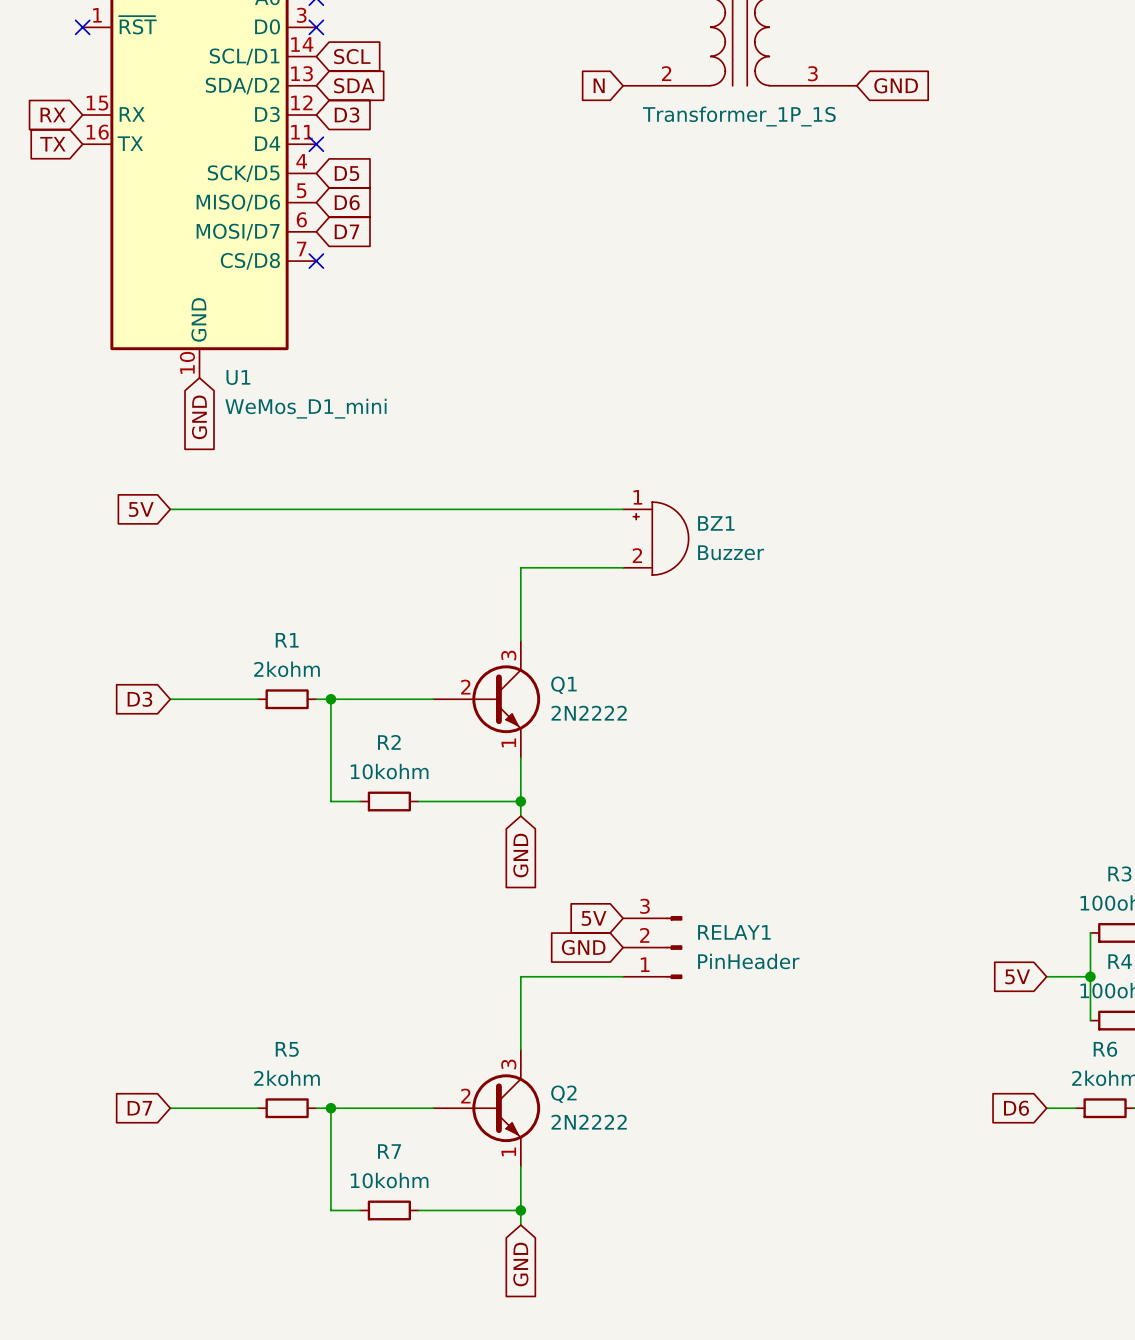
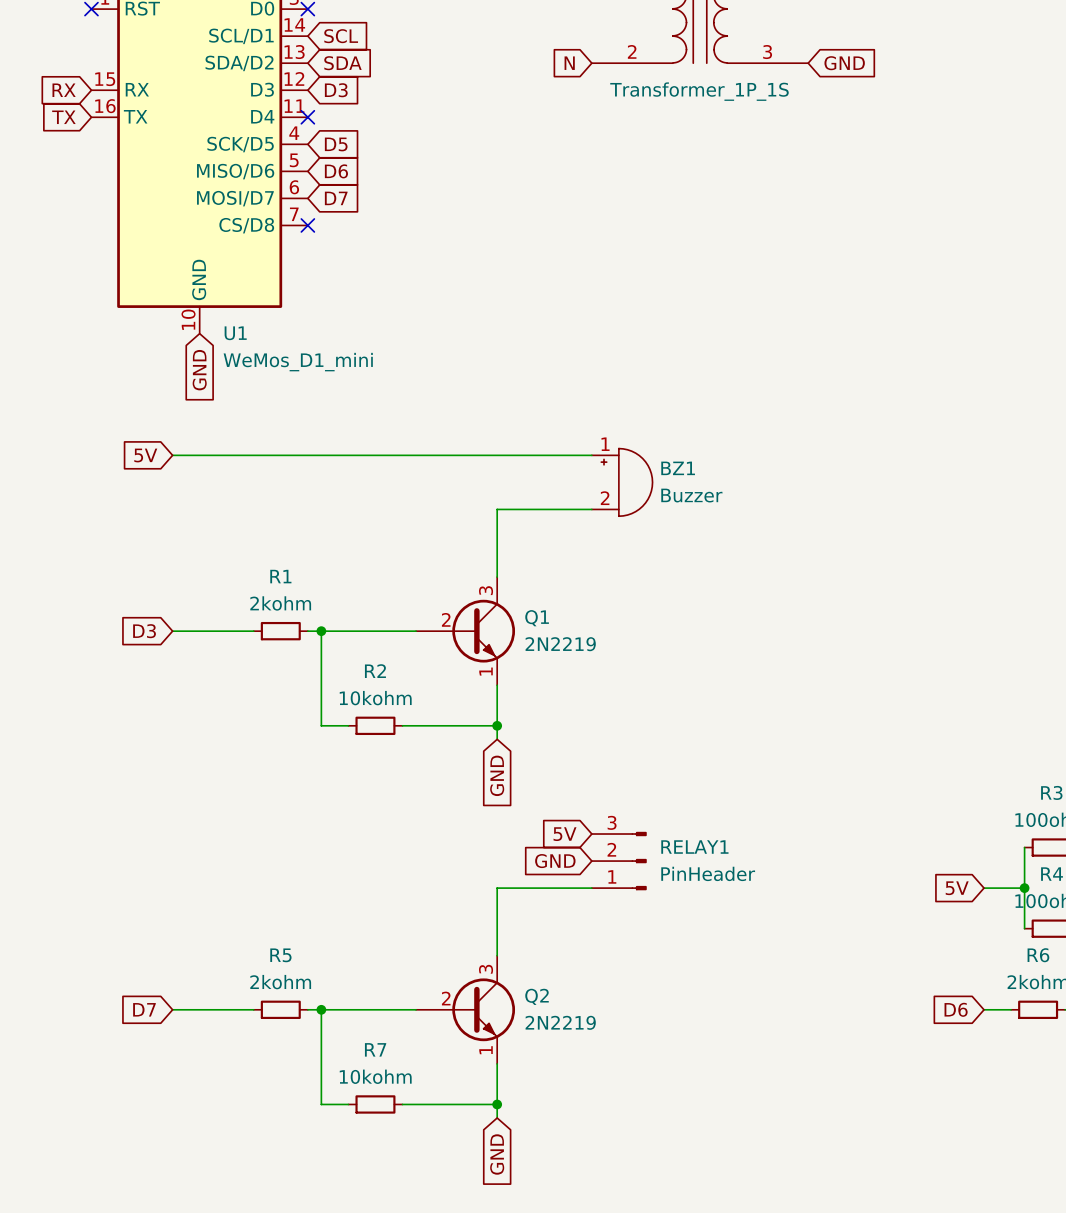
Q1 value: 2N2222 (589, 713) -> 2N2219 (560, 644)
Q2 value: 2N2222 (589, 1122) -> 2N2219 (560, 1022)

